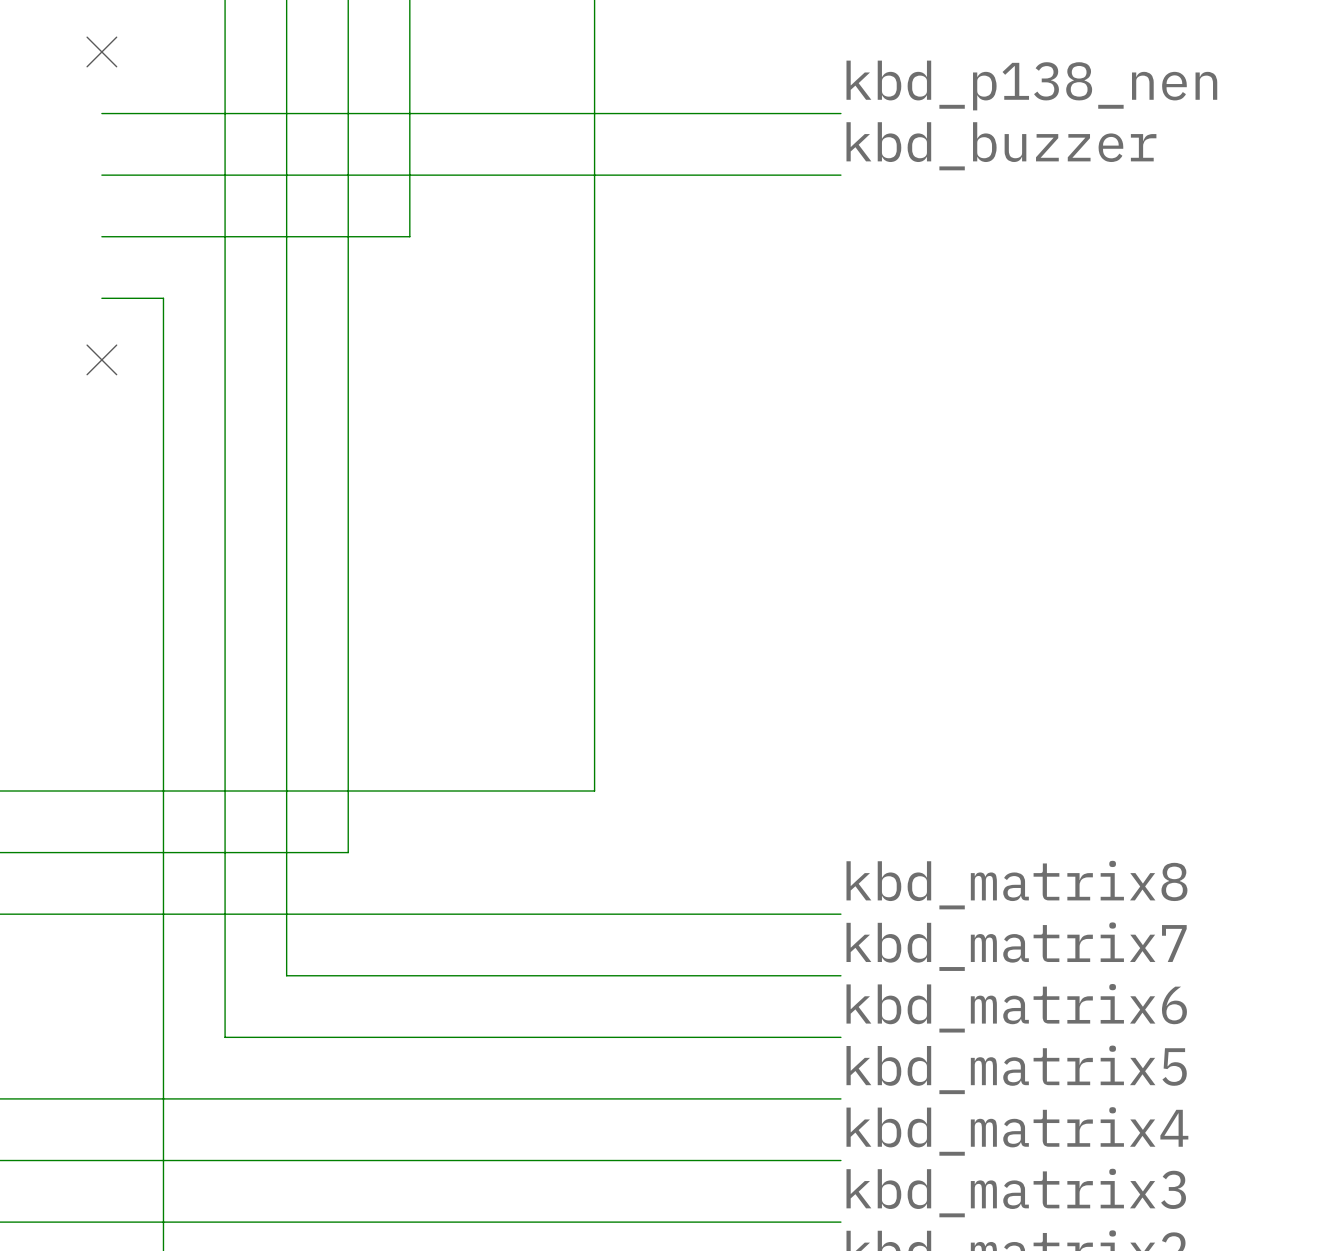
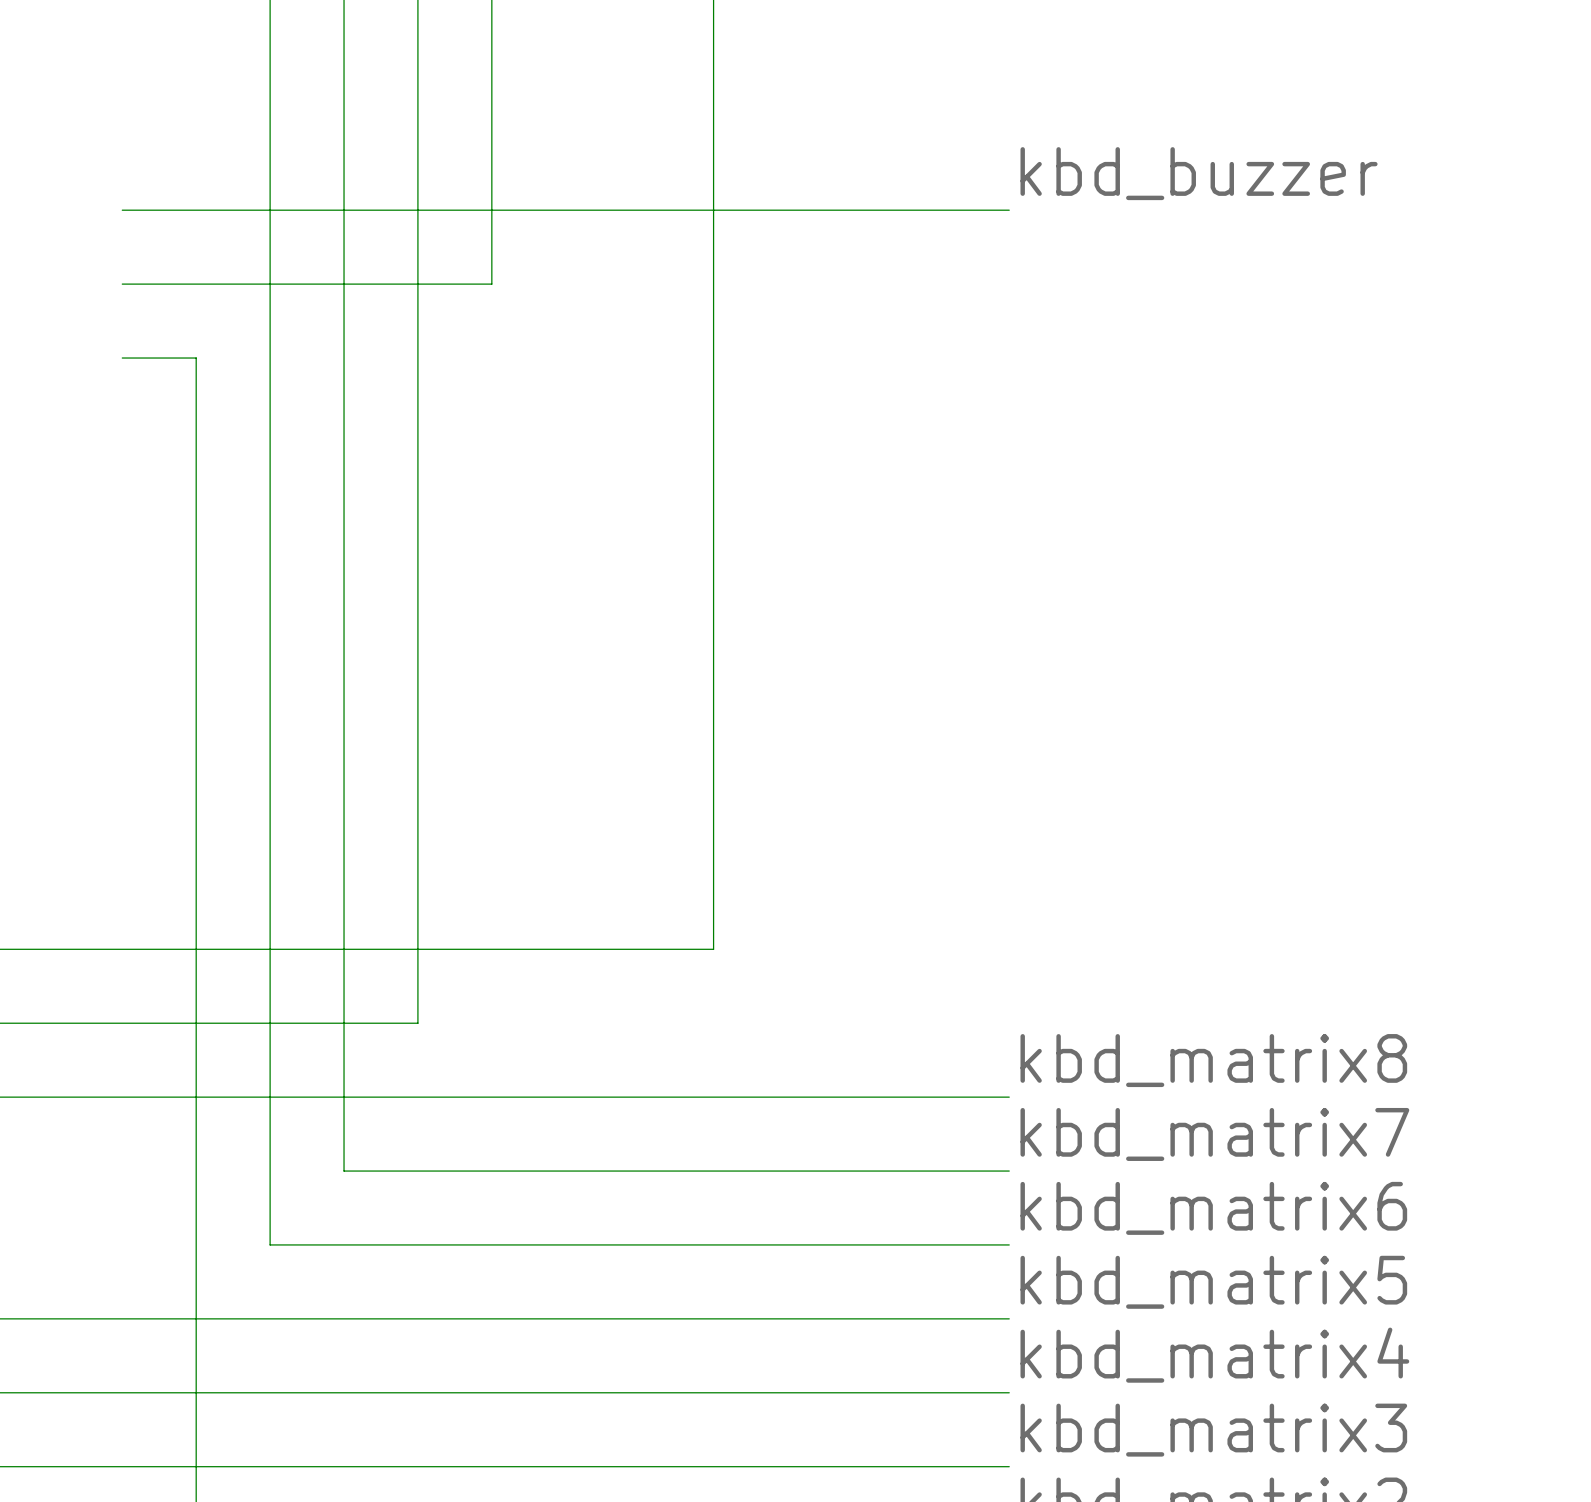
no-connect mark: (101, 51) -> none
label: kbd_p138_nen (1031, 85) -> none
wire: (101, 113) (840, 113) -> none
no-connect mark: (101, 359) -> none

